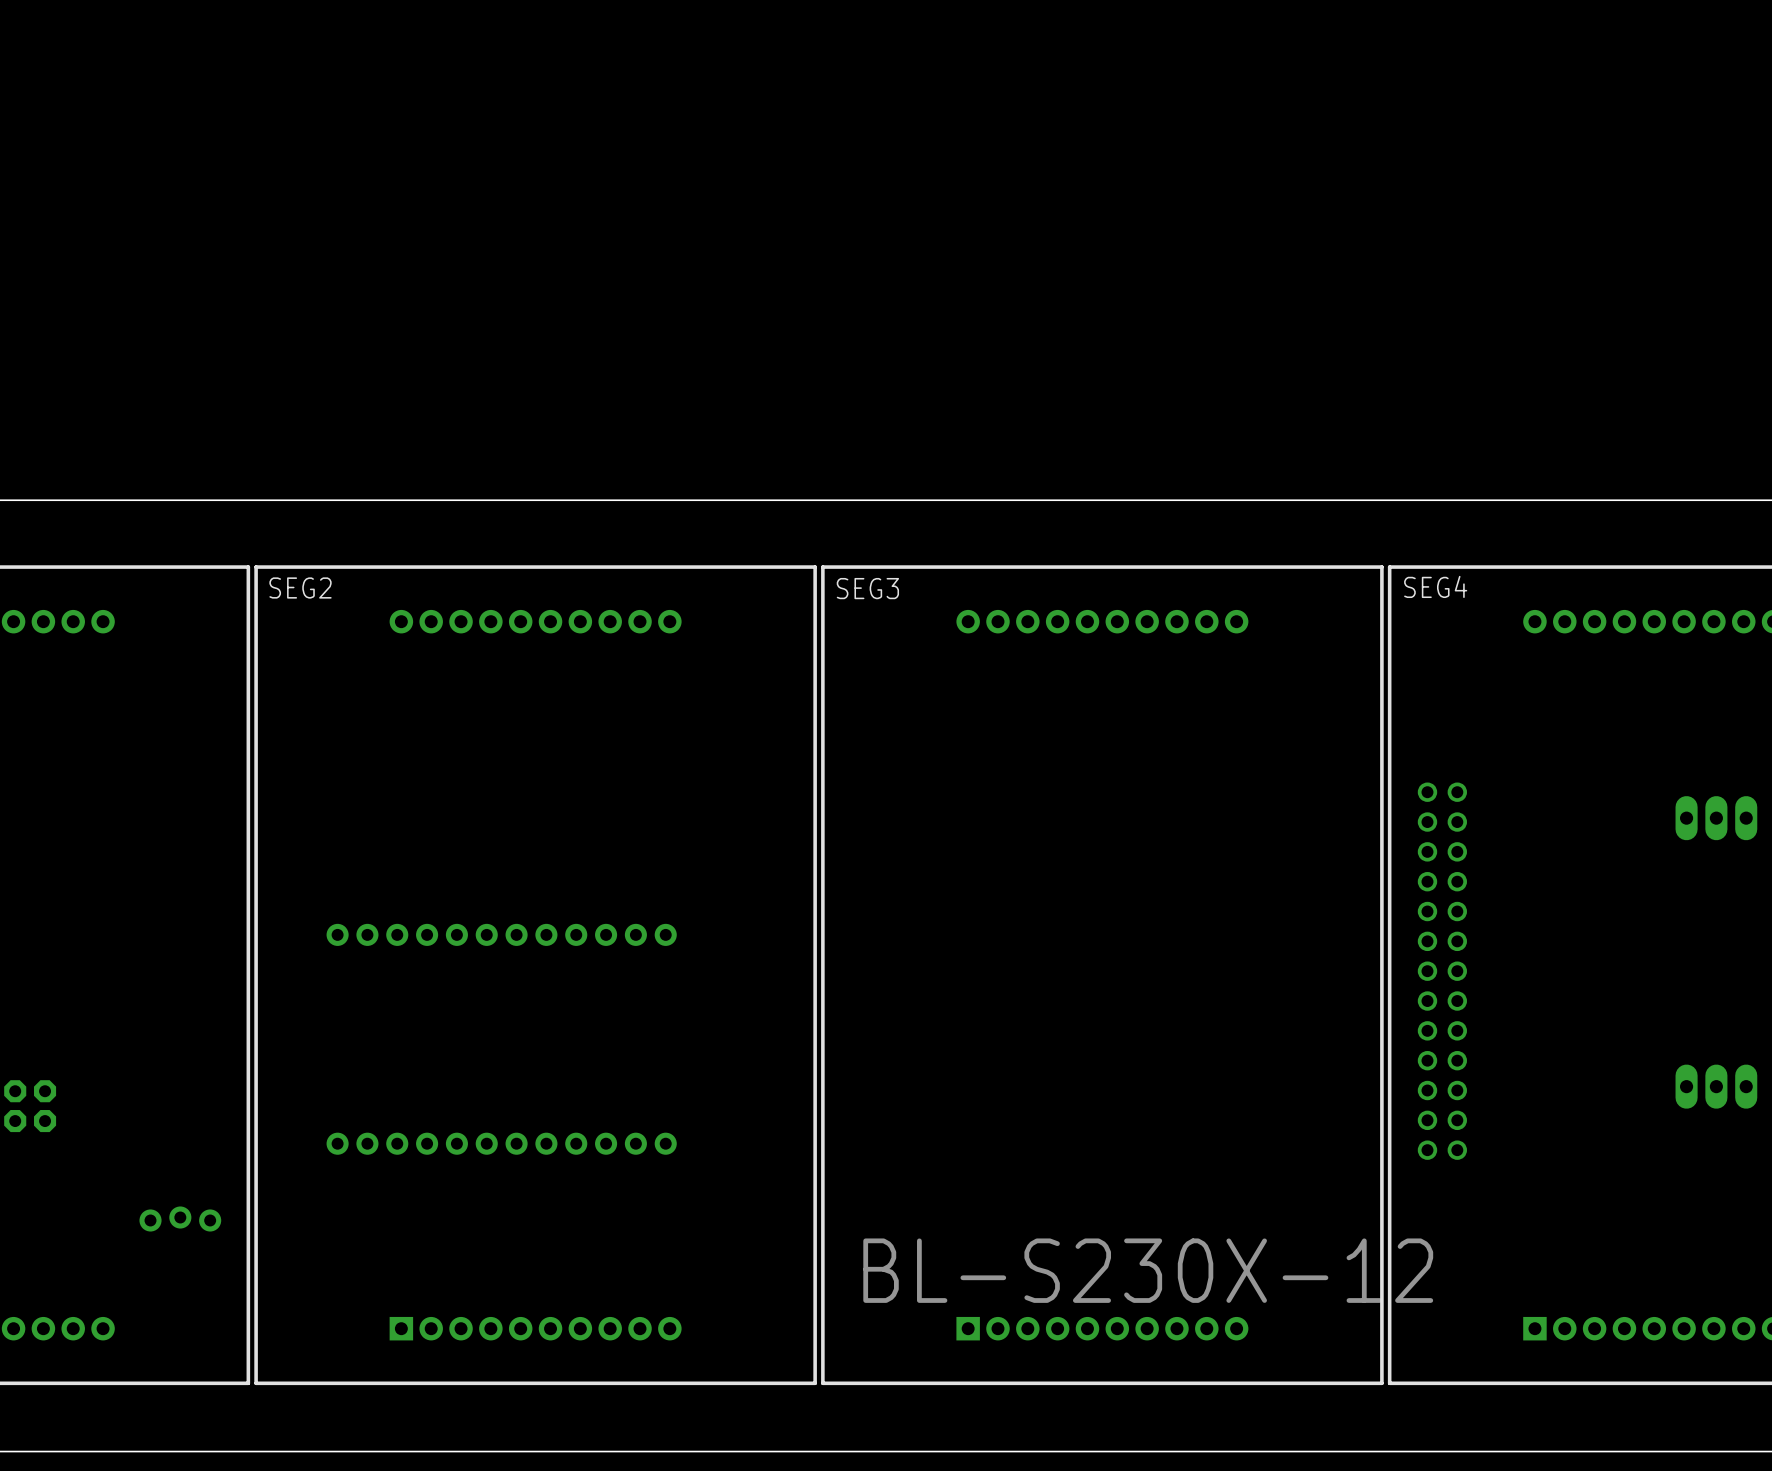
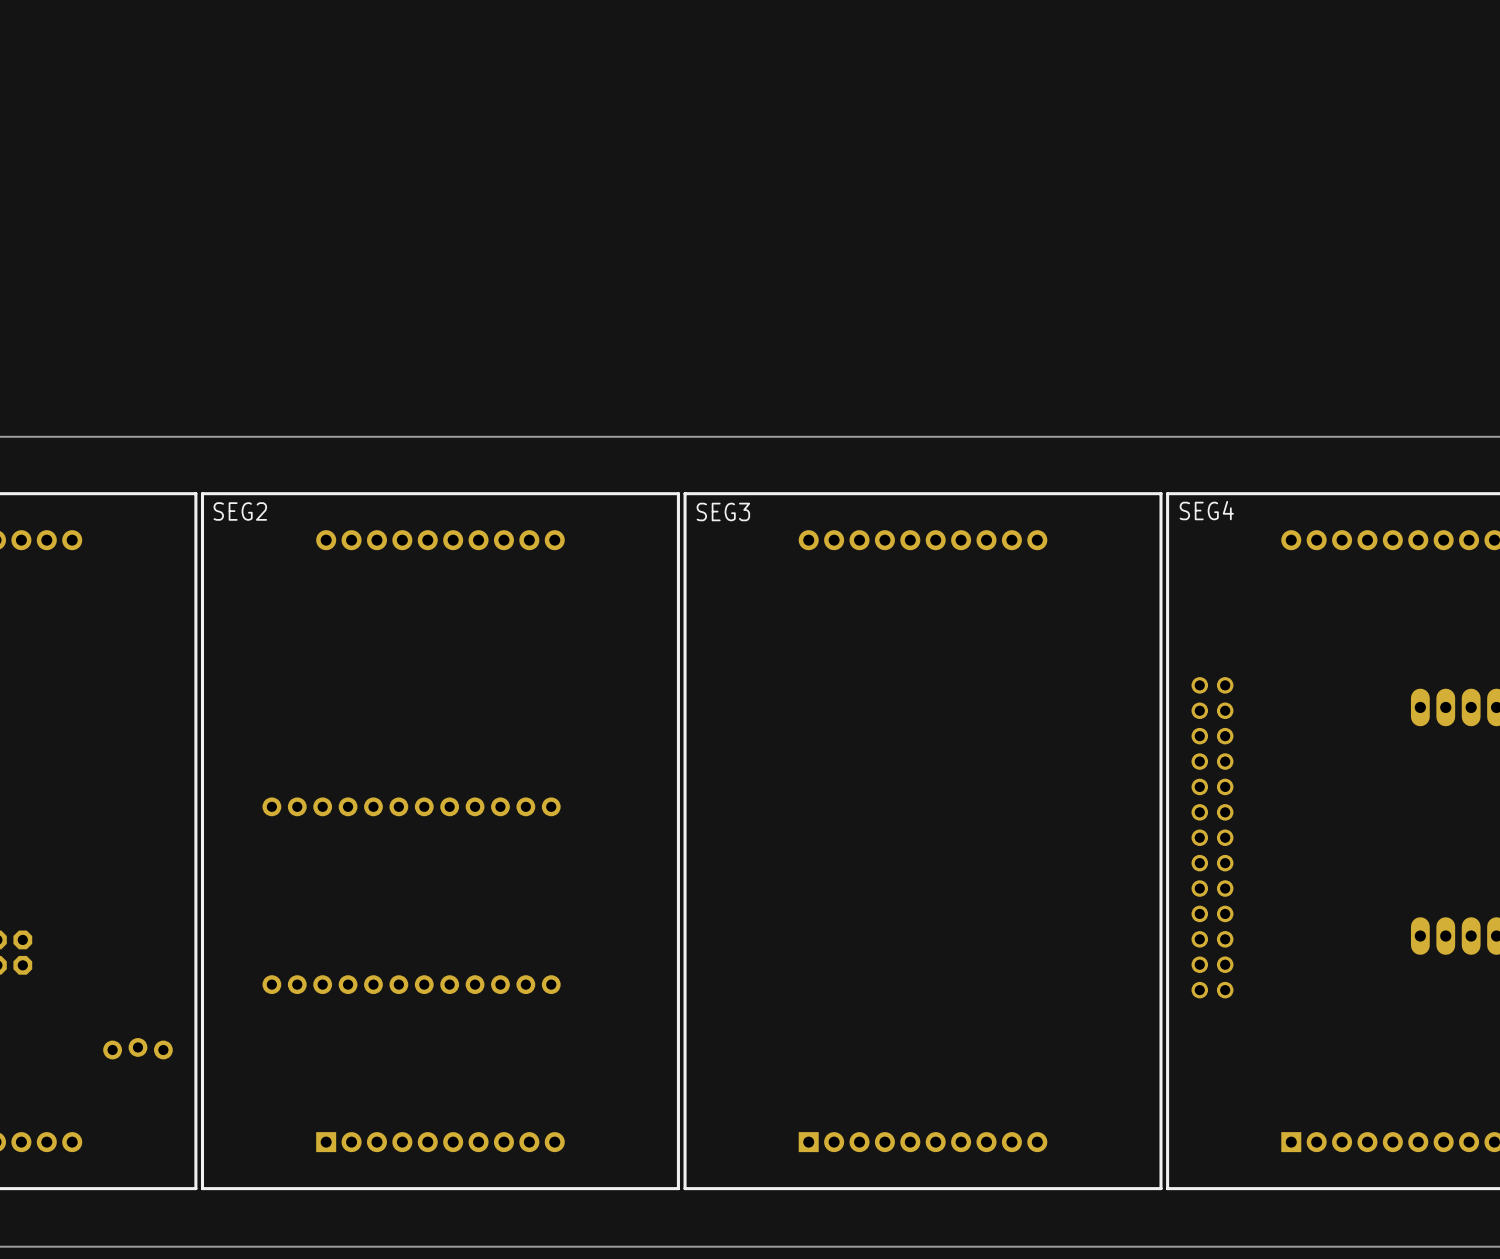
part value: BL-S230X-12 (1148, 1270) -> none

